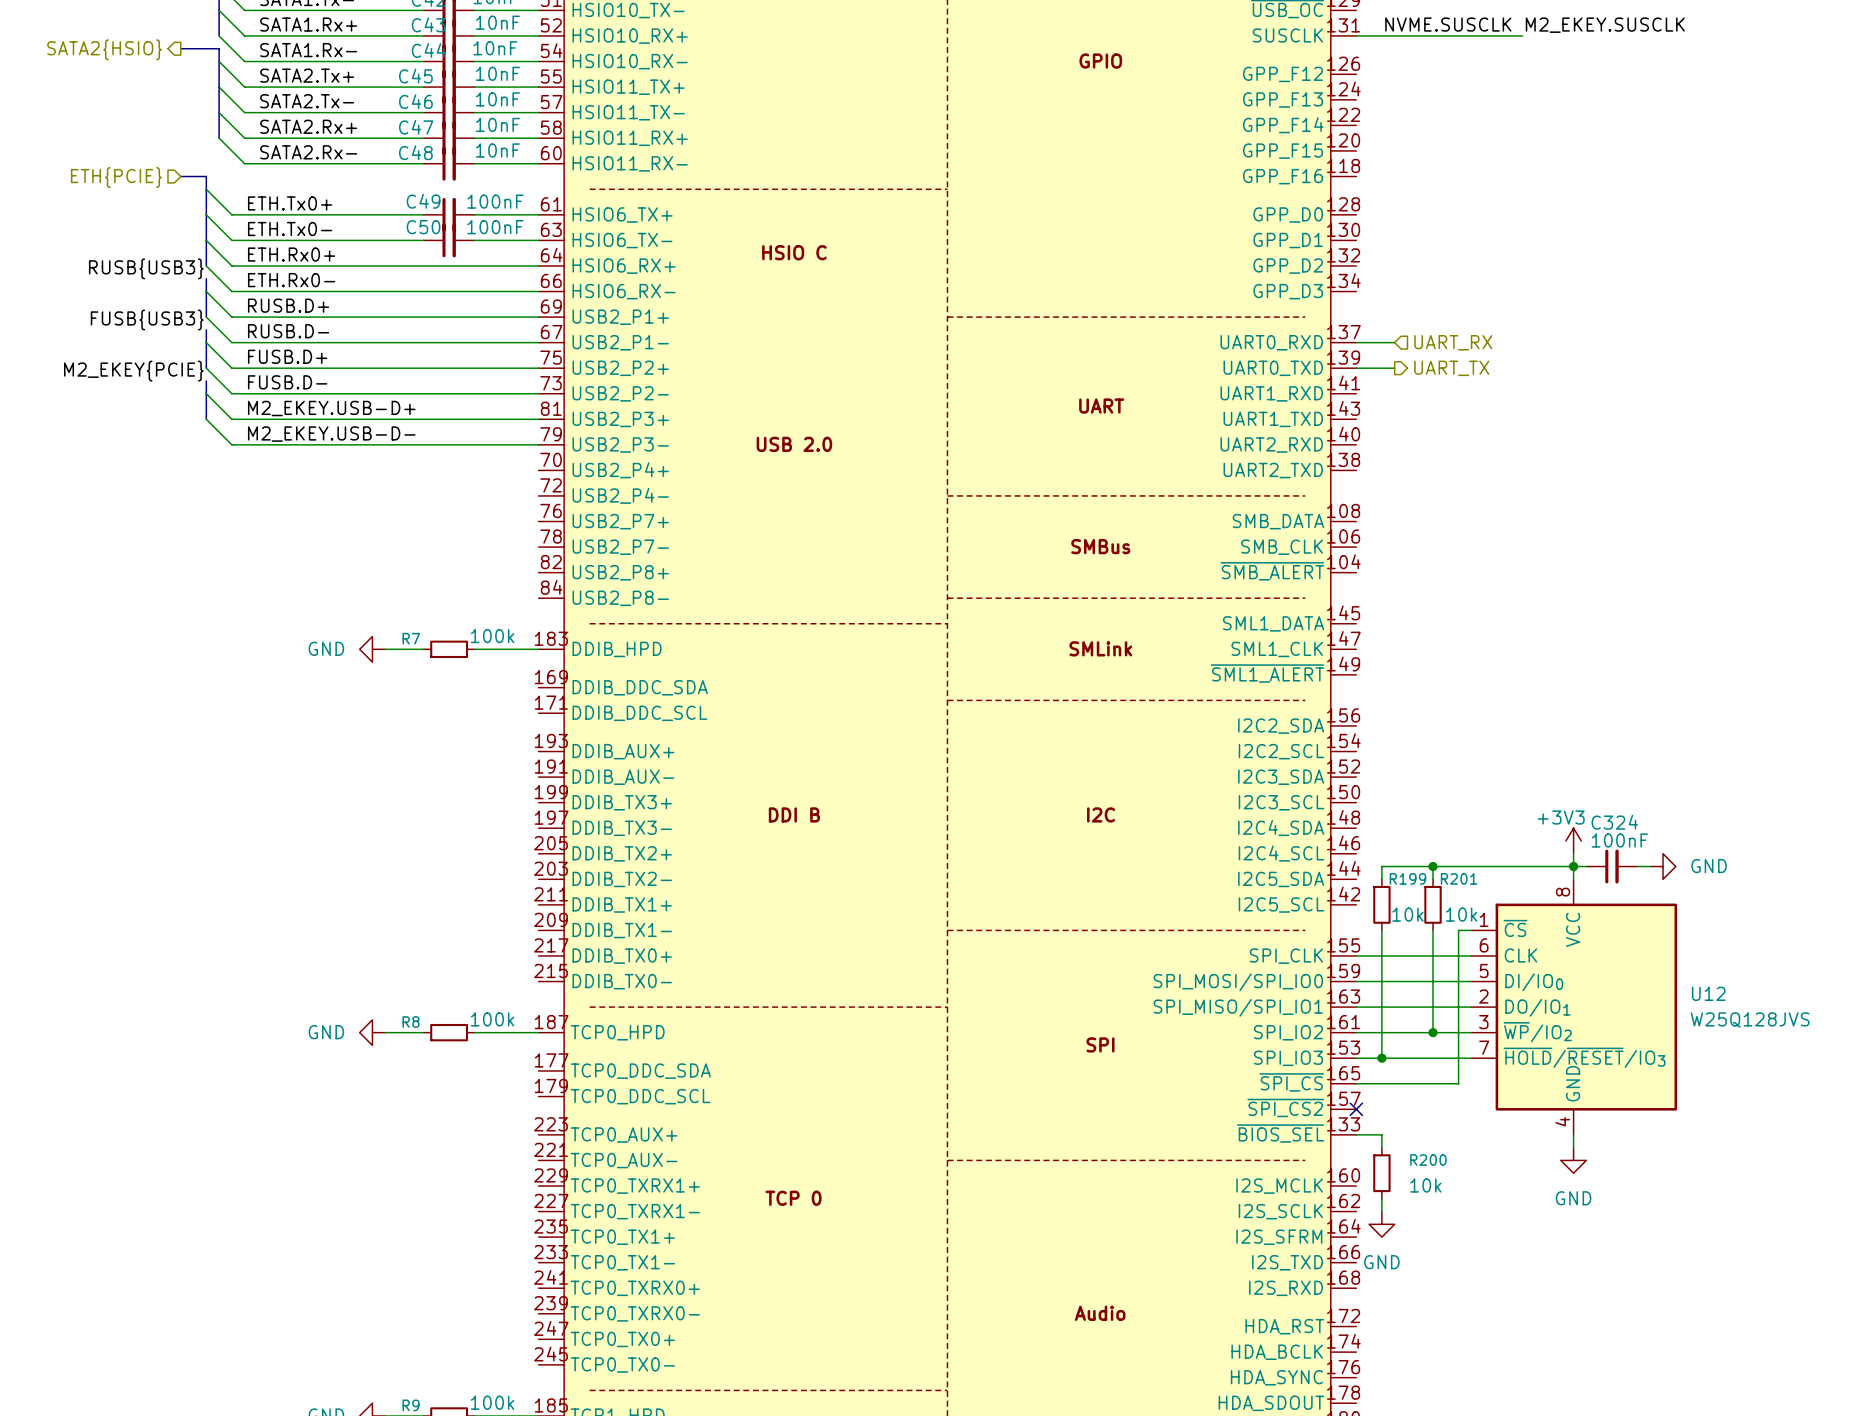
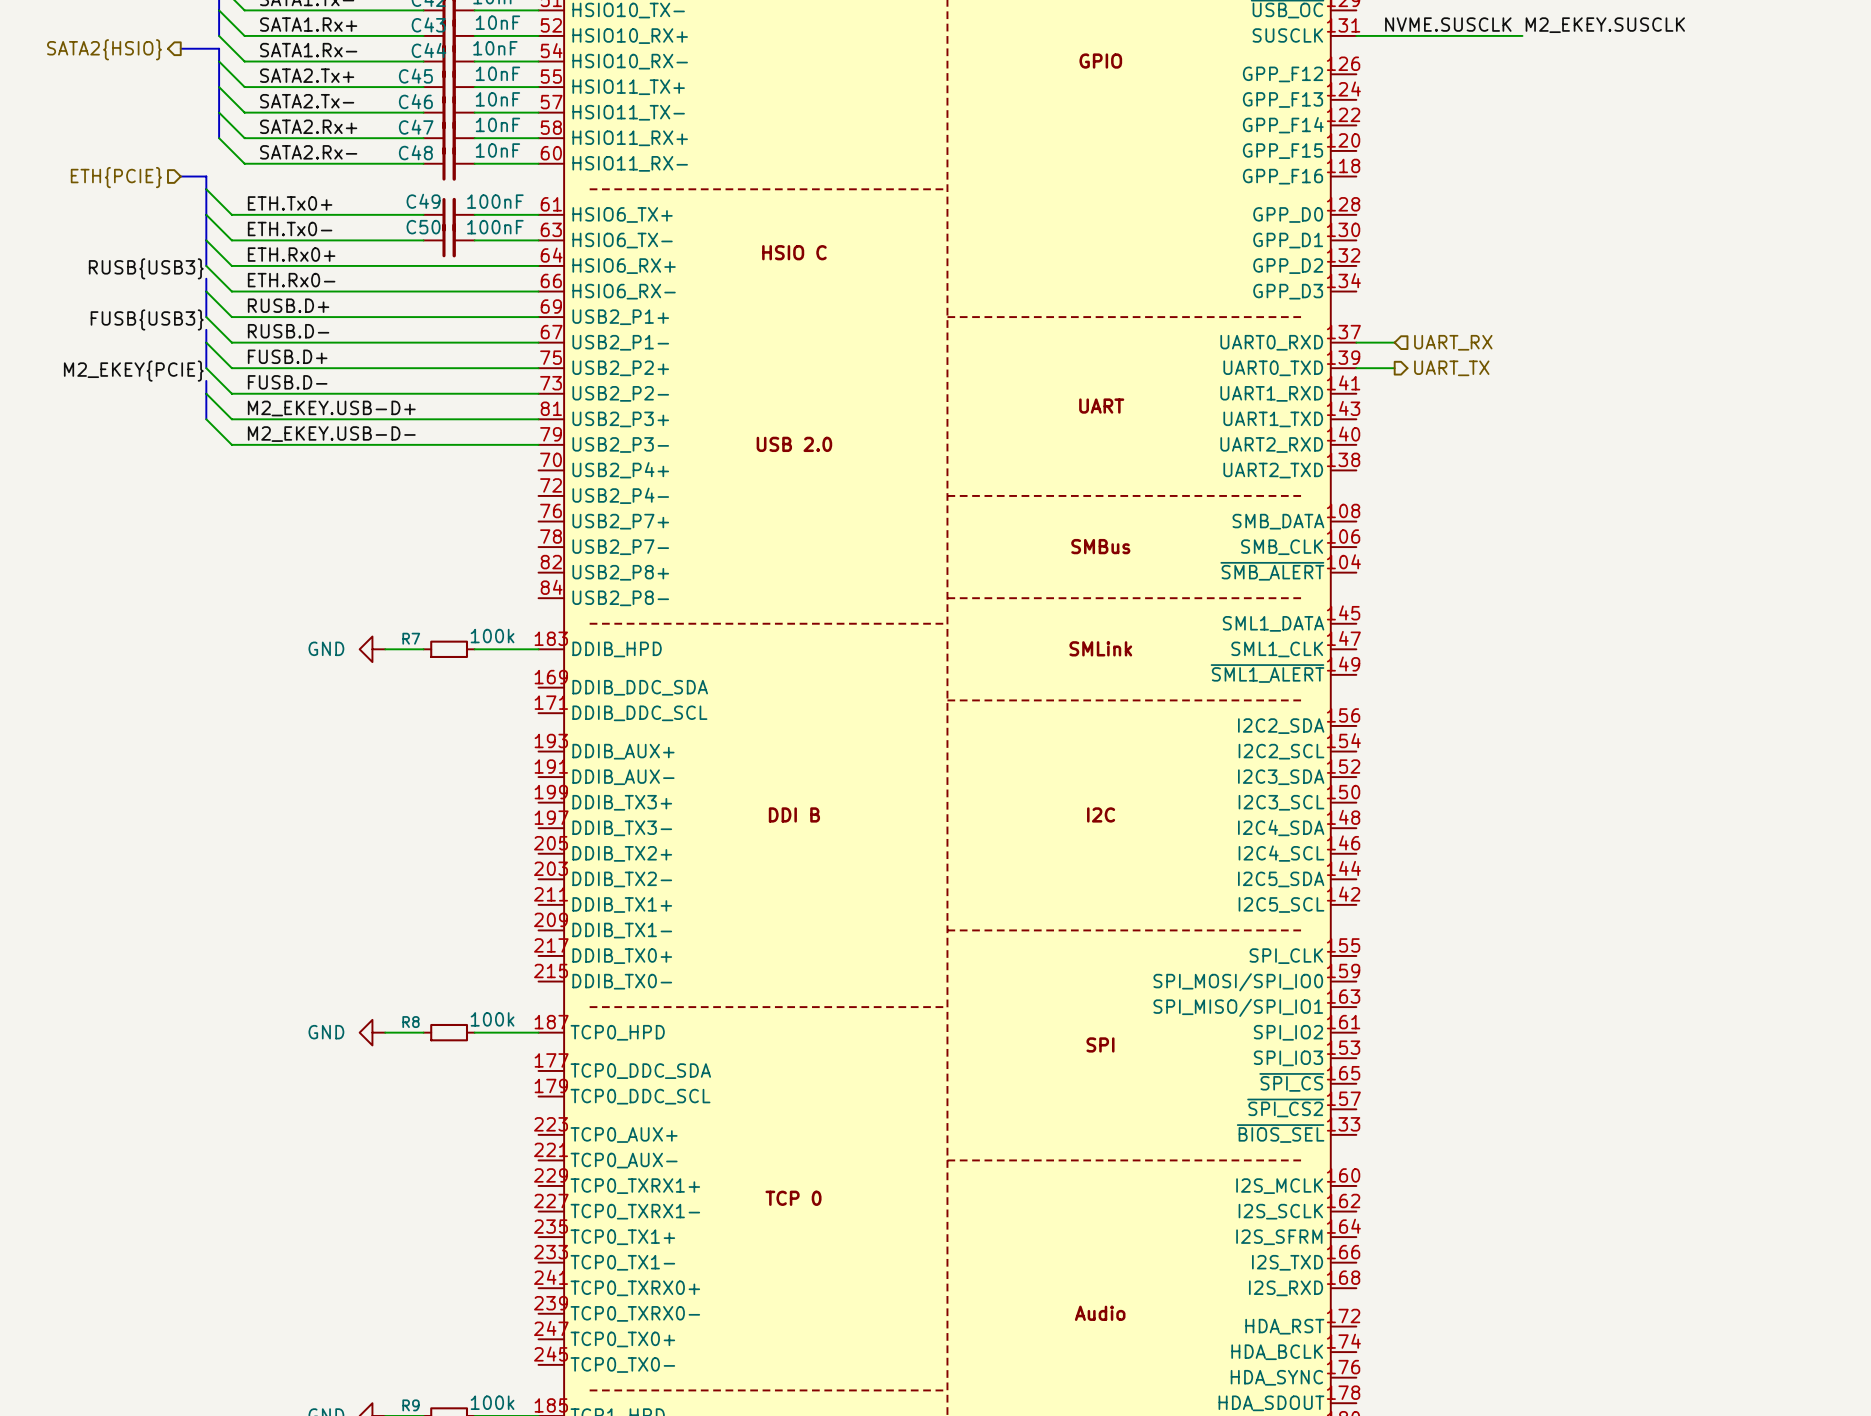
power symbol: +3V3 (1573, 840) -> none
wire: (1573, 853) (1573, 879) -> none
wire: (1433, 866) (1433, 879) -> none
junction: (1433, 866) -> none
junction: (1573, 866) -> none
wire: (1586, 866) (1381, 866) (1381, 879) -> none
C324: 100nF (1611, 866) -> none
wire: (1637, 866) (1650, 866) -> none
power symbol: GND (1663, 866) -> none
R199: 10k (1381, 904) -> none
R201: 10k (1433, 904) -> none
wire: (1381, 930) (1381, 1058) -> none
wire: (1433, 930) (1433, 1032) -> none
wire: (1471, 930) (1458, 930) (1458, 1083) (1356, 1083) -> none
wire: (1356, 955) (1471, 955) -> none
wire: (1356, 981) (1471, 981) -> none
wire: (1356, 1007) (1471, 1007) -> none
U12: W25Q128JVS (1574, 1007) -> none
wire: (1356, 1032) (1471, 1032) -> none
junction: (1433, 1032) -> none
wire: (1356, 1058) (1471, 1058) -> none
junction: (1381, 1058) -> none
no-connect mark: (1356, 1109) -> none
wire: (1356, 1134) (1381, 1134) (1381, 1147) -> none
wire: (1573, 1134) (1573, 1147) -> none
power symbol: GND (1573, 1160) -> none
R200: 10k (1381, 1173) -> none
wire: (1381, 1198) (1381, 1211) -> none
power symbol: GND (1381, 1224) -> none

